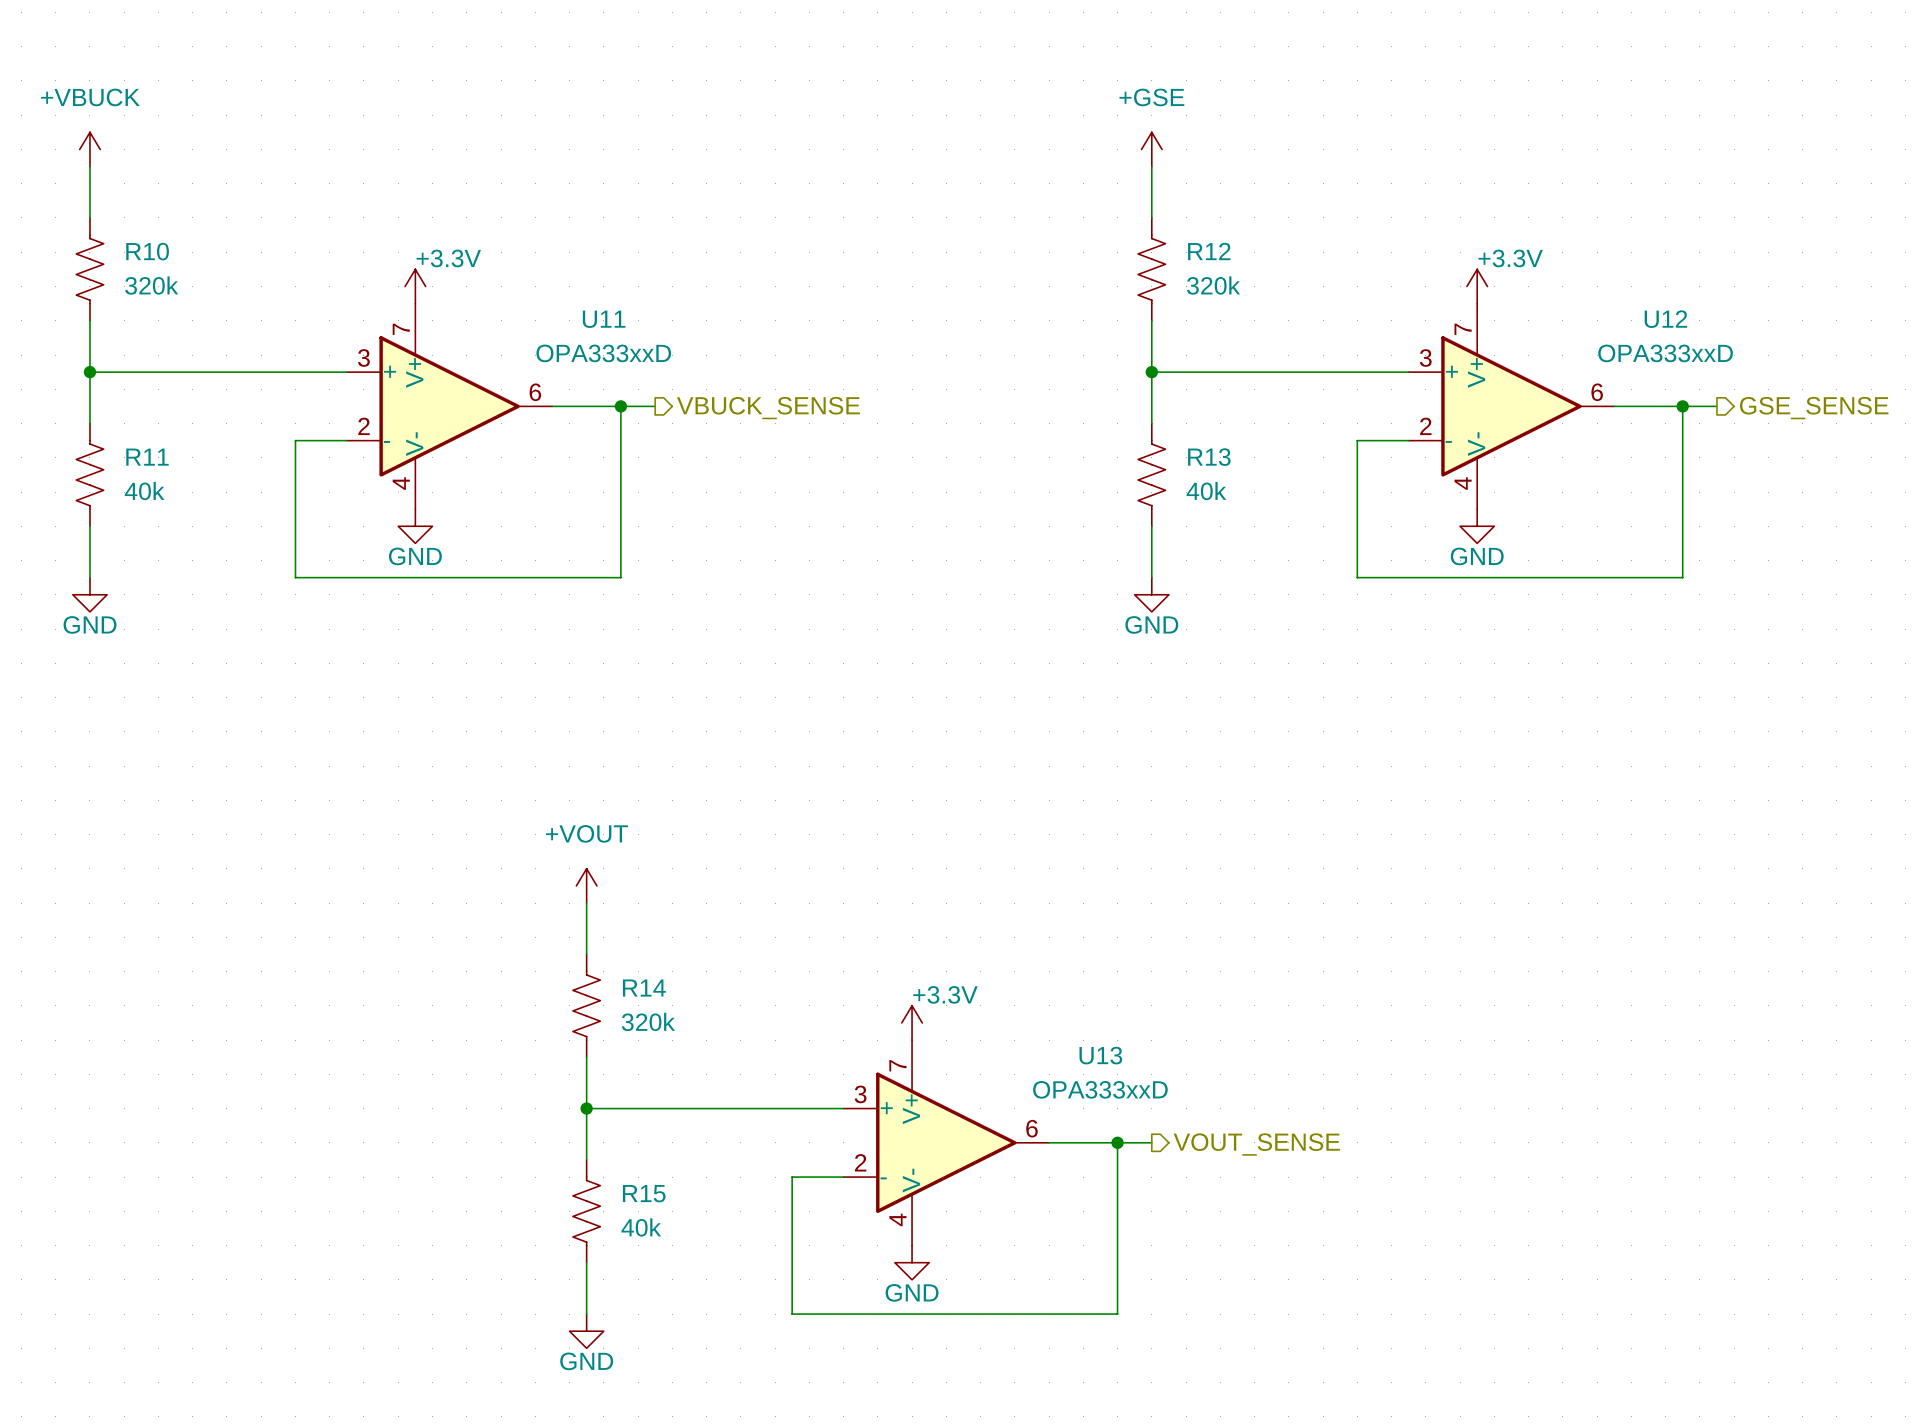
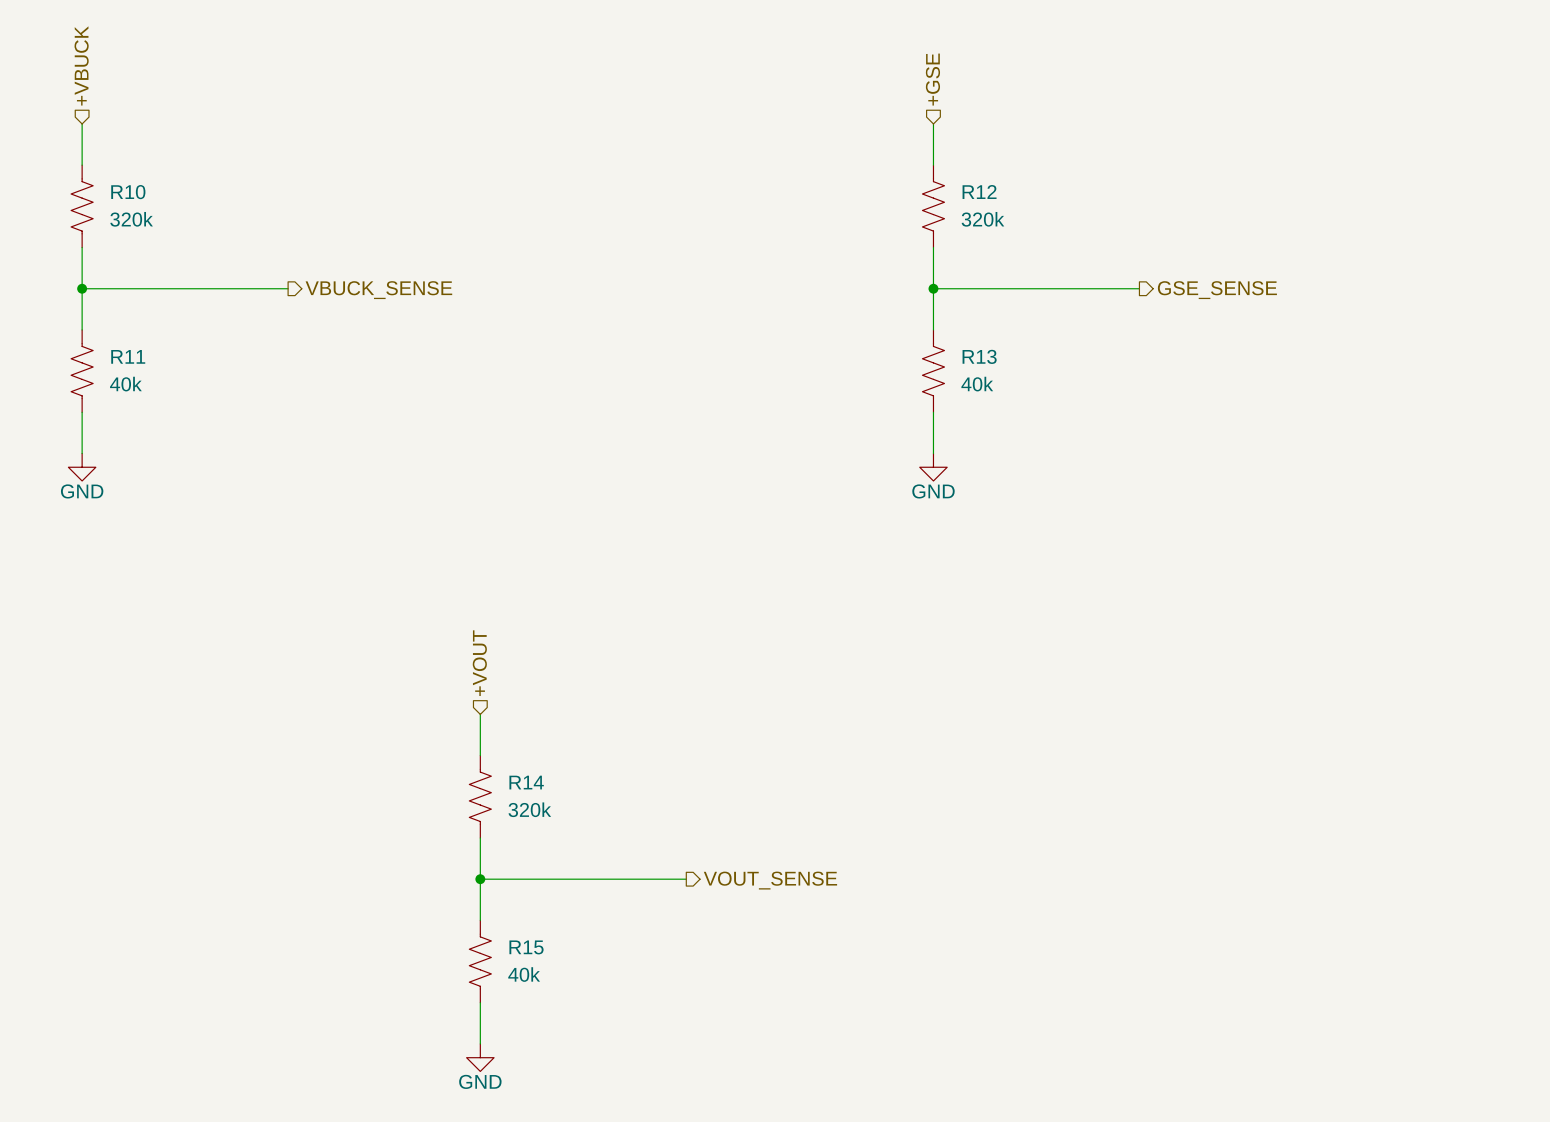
hierarchical label: none -> +VBUCK (81, 65)
hierarchical label: none -> +GSE (932, 79)
power symbol: +VBUCK (89, 149) -> none
power symbol: +GSE (1151, 149) -> none
power symbol: +3.3V (415, 286) -> none
power symbol: +3.3V (1477, 286) -> none
U11: OPA333xxD (449, 406) -> none
wire: (552, 406) (655, 406) -> none
wire: (620, 406) (620, 577) (295, 577) (295, 440) (346, 440) -> none
junction: (620, 406) -> none
U12: OPA333xxD (1511, 406) -> none
wire: (1614, 406) (1716, 406) -> none
wire: (1682, 406) (1682, 577) (1357, 577) (1357, 440) (1408, 440) -> none
junction: (1682, 406) -> none
hierarchical label position: VBUCK_SENSE (768, 408) -> VBUCK_SENSE (378, 290)
hierarchical label position: GSE_SENSE (1814, 408) -> GSE_SENSE (1217, 290)
power symbol: GND (415, 526) -> none
power symbol: GND (1477, 526) -> none
hierarchical label: none -> +VOUT (479, 663)
power symbol: +VOUT (586, 885) -> none
power symbol: +3.3V (912, 1022) -> none
U13: OPA333xxD (946, 1142) -> none
wire: (1049, 1142) (1151, 1142) -> none
wire: (1117, 1142) (1117, 1314) (792, 1314) (792, 1177) (843, 1177) -> none
junction: (1117, 1142) -> none
hierarchical label position: VOUT_SENSE (1256, 1144) -> VOUT_SENSE (770, 880)
power symbol: GND (912, 1262) -> none

